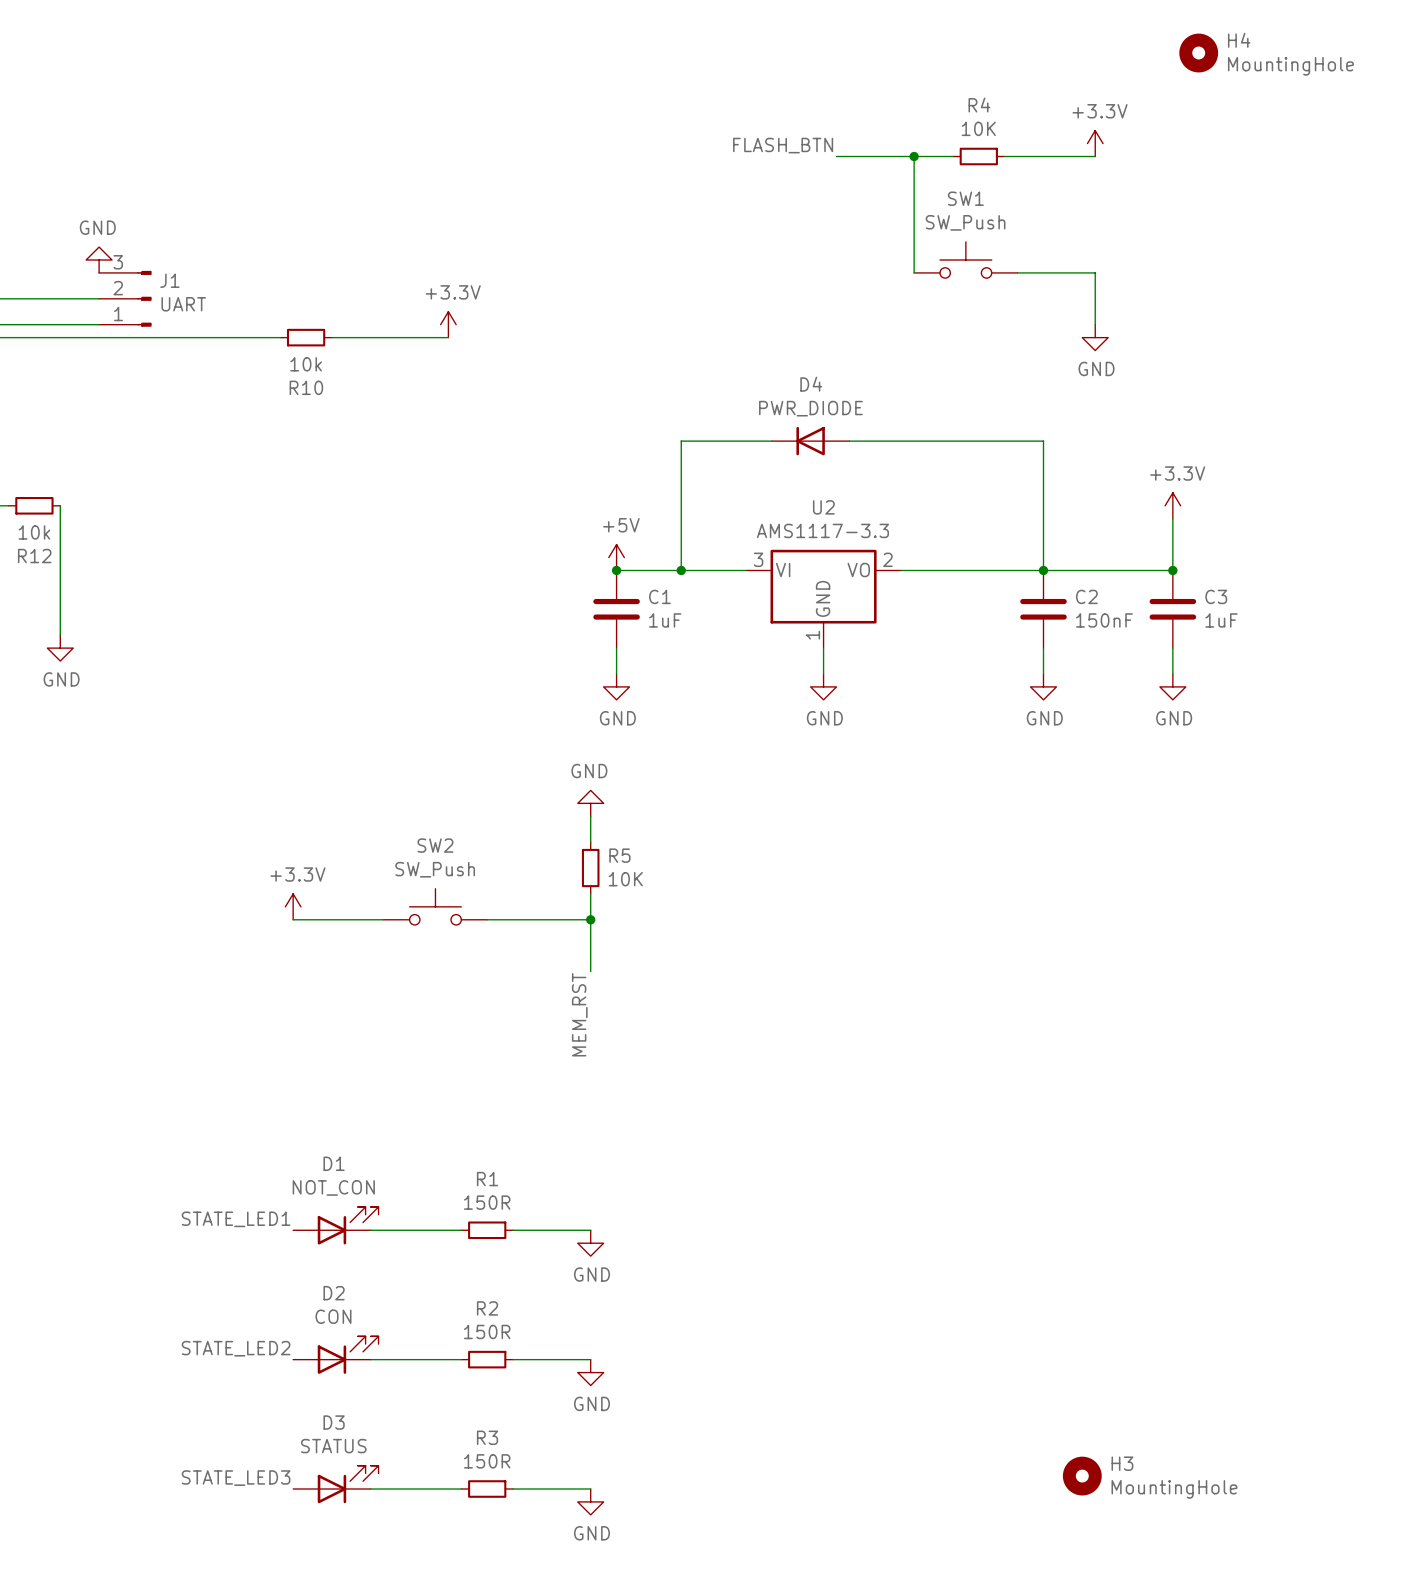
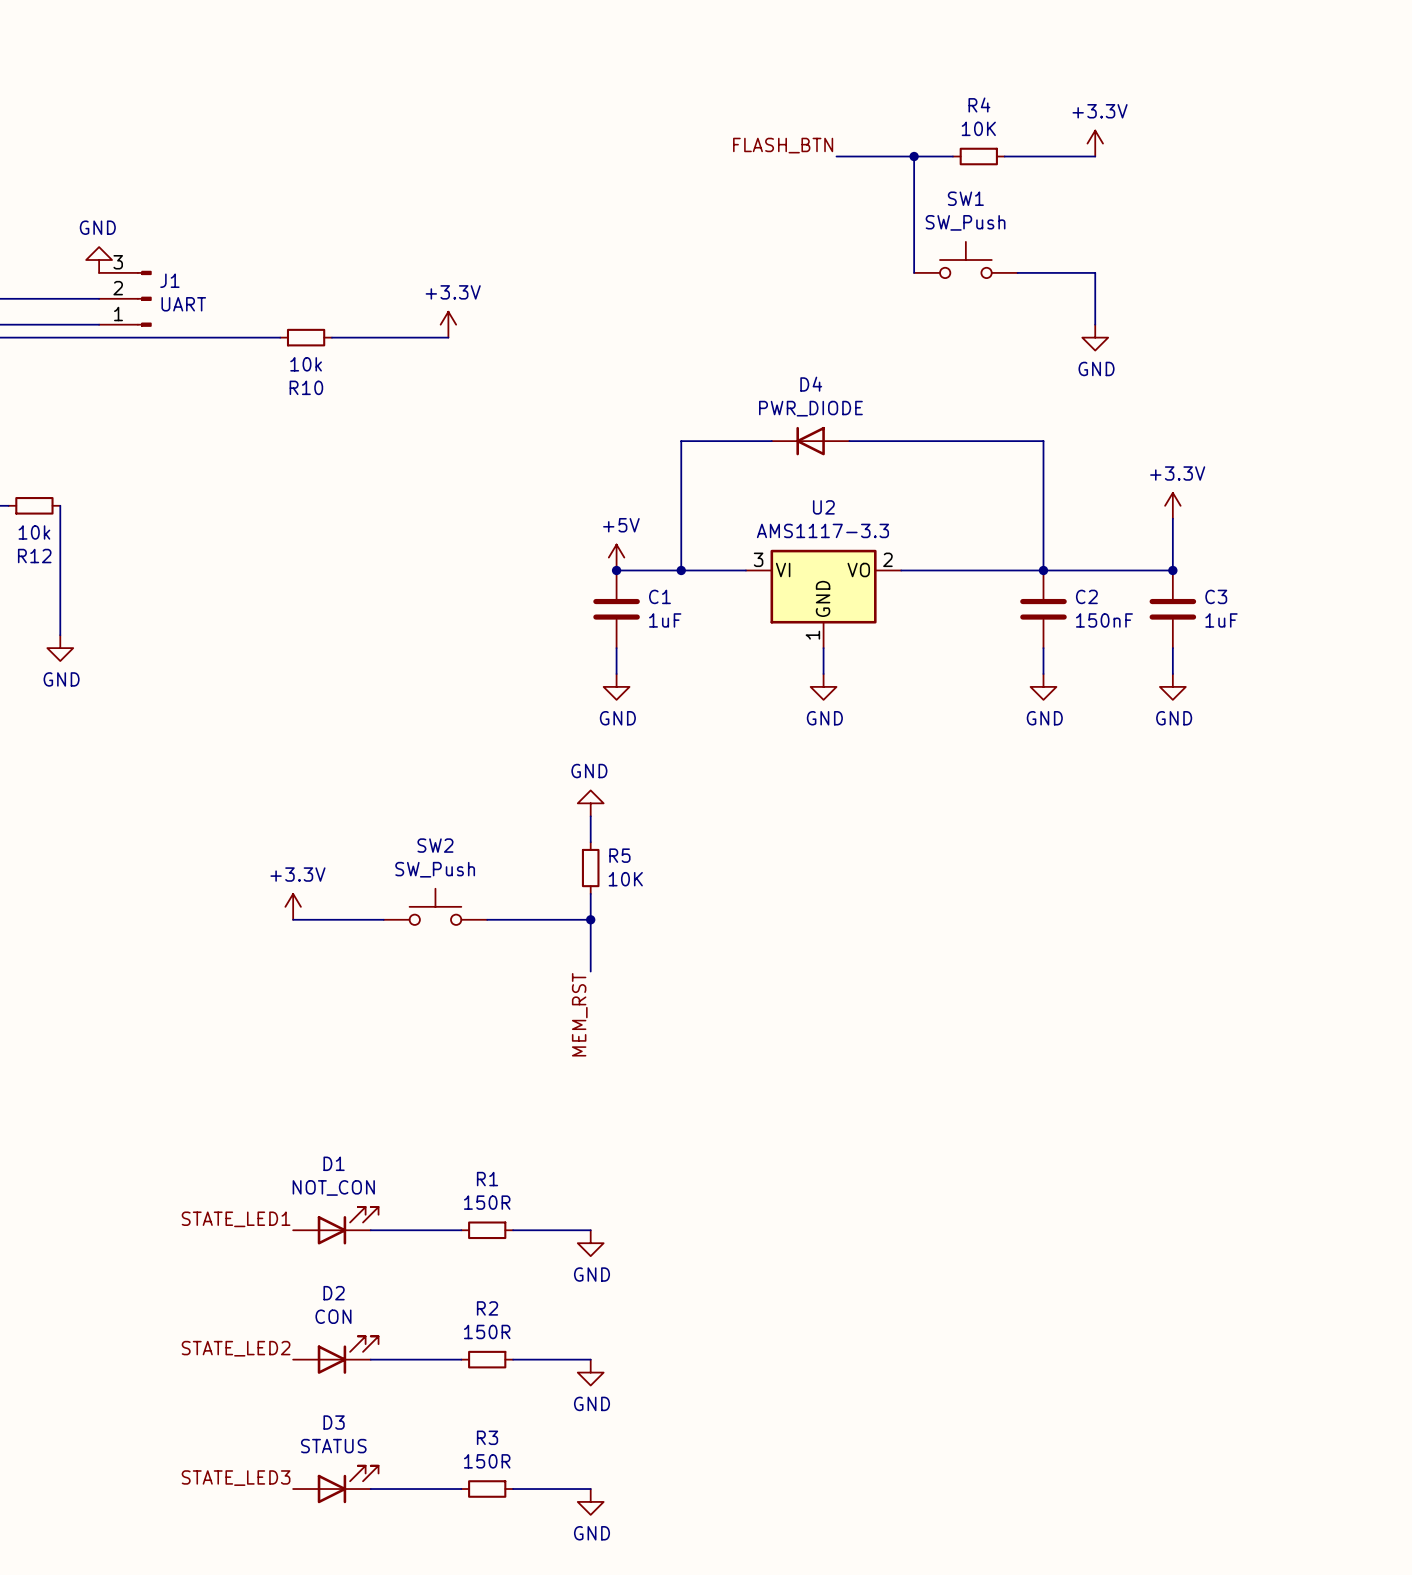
H4: MountingHole (1198, 53) -> none
H3: MountingHole (1082, 1476) -> none

